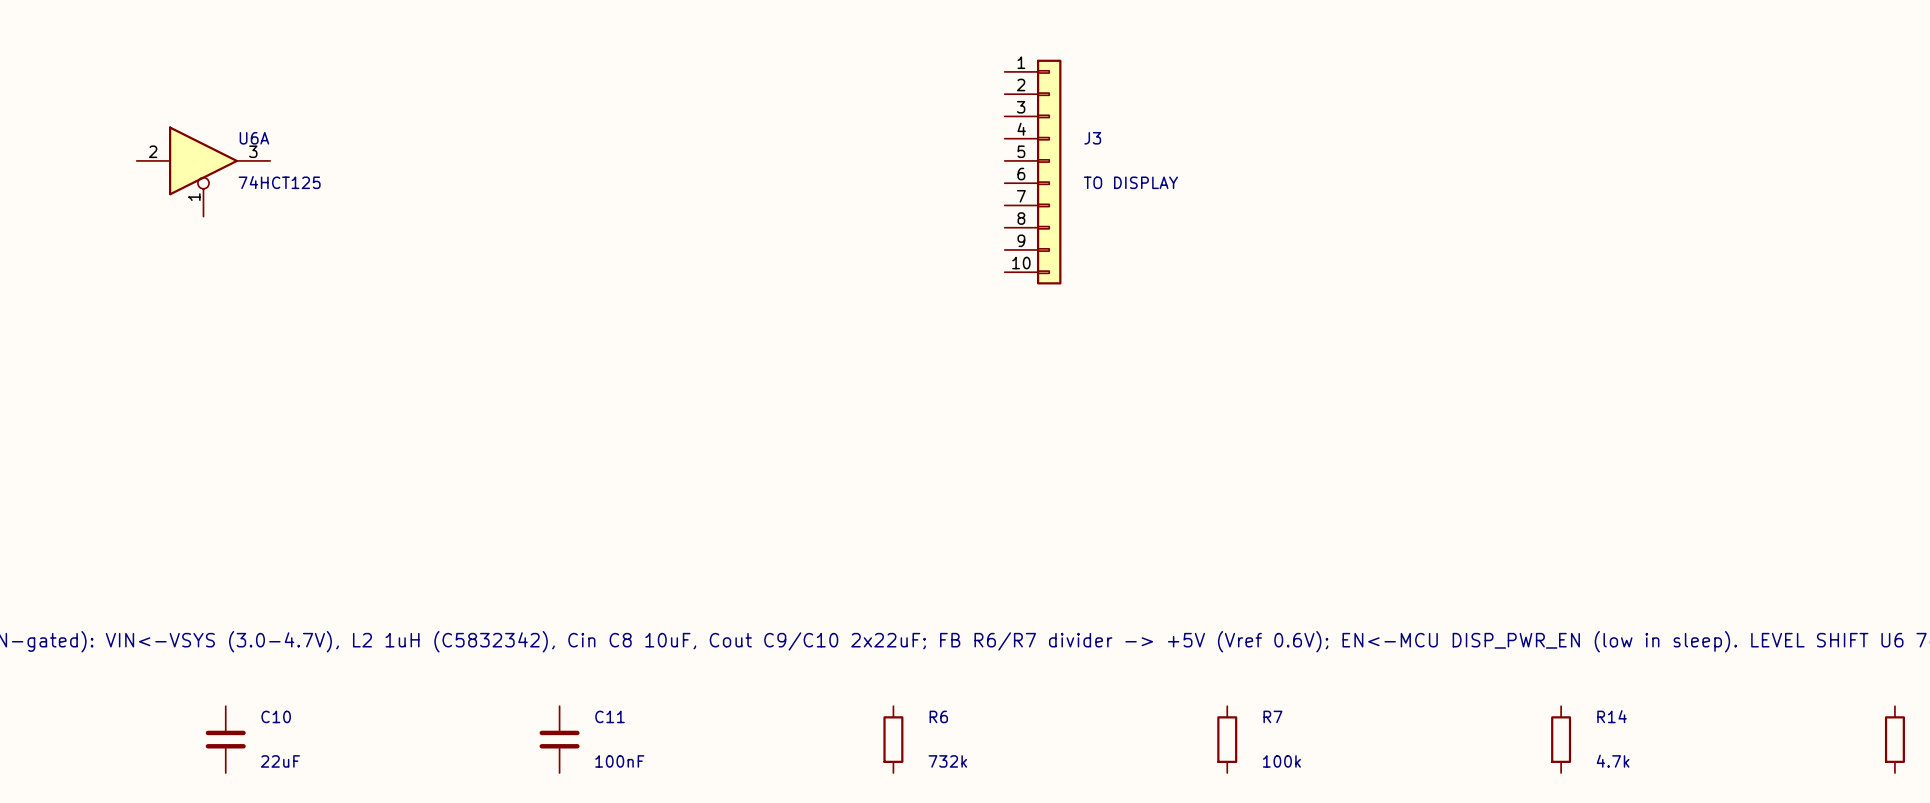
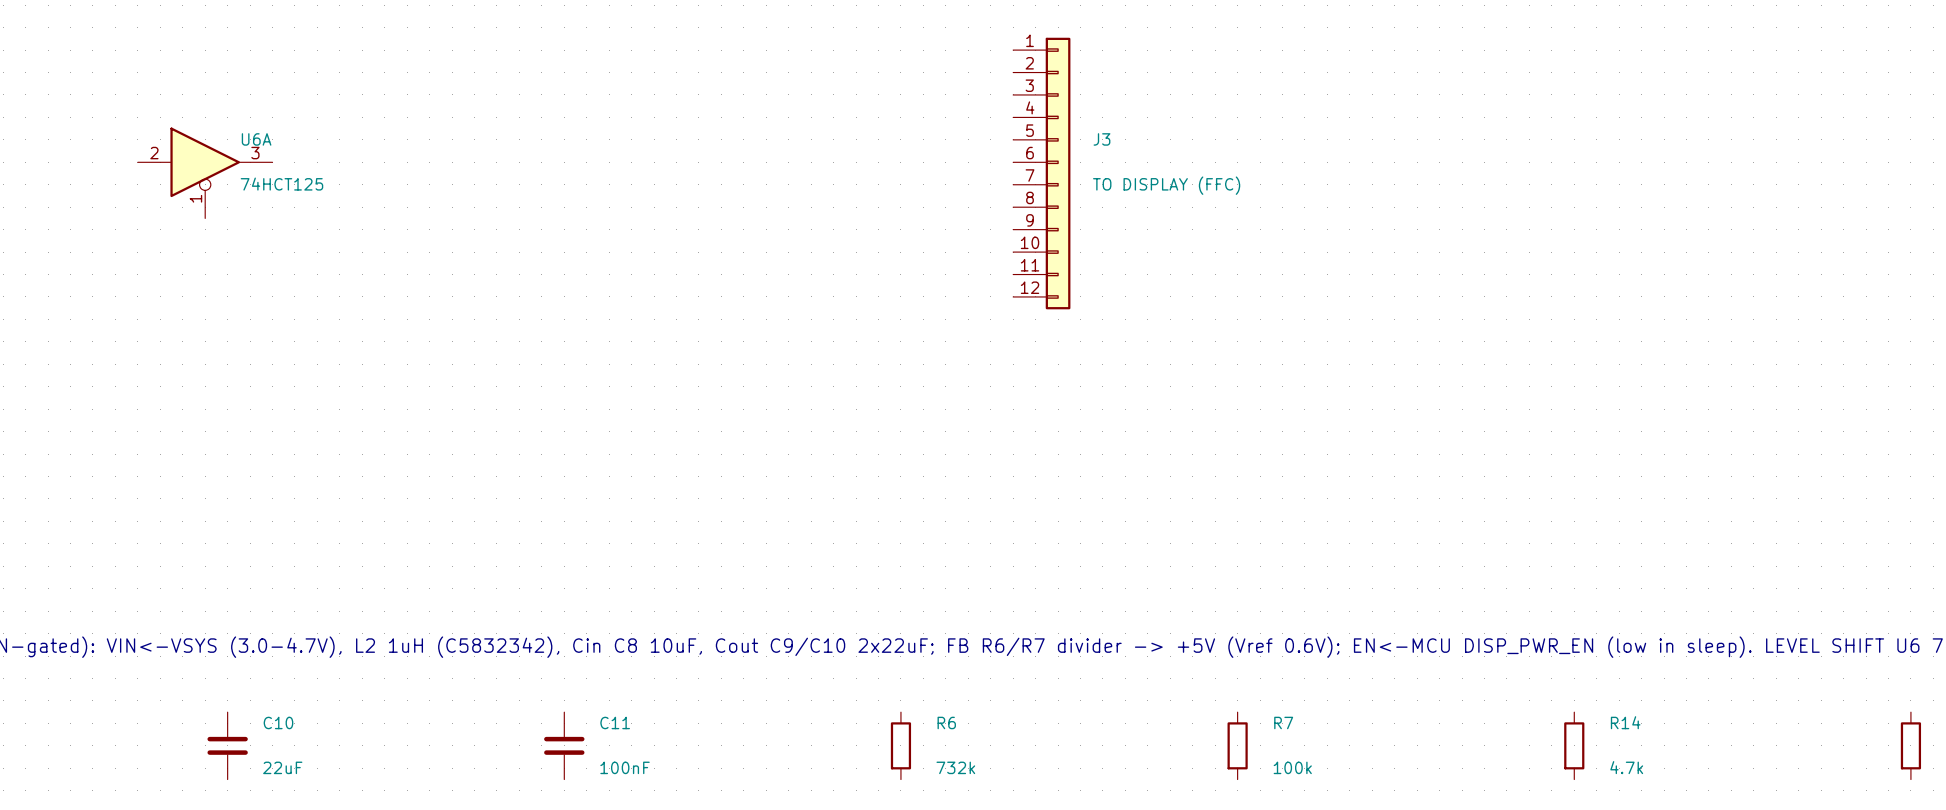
J3 symbol: [1004, 59, 1062, 285] -> [1013, 37, 1071, 310]
J3 value: TO DISPLAY (1130, 182) -> TO DISPLAY (FFC) (1166, 185)

